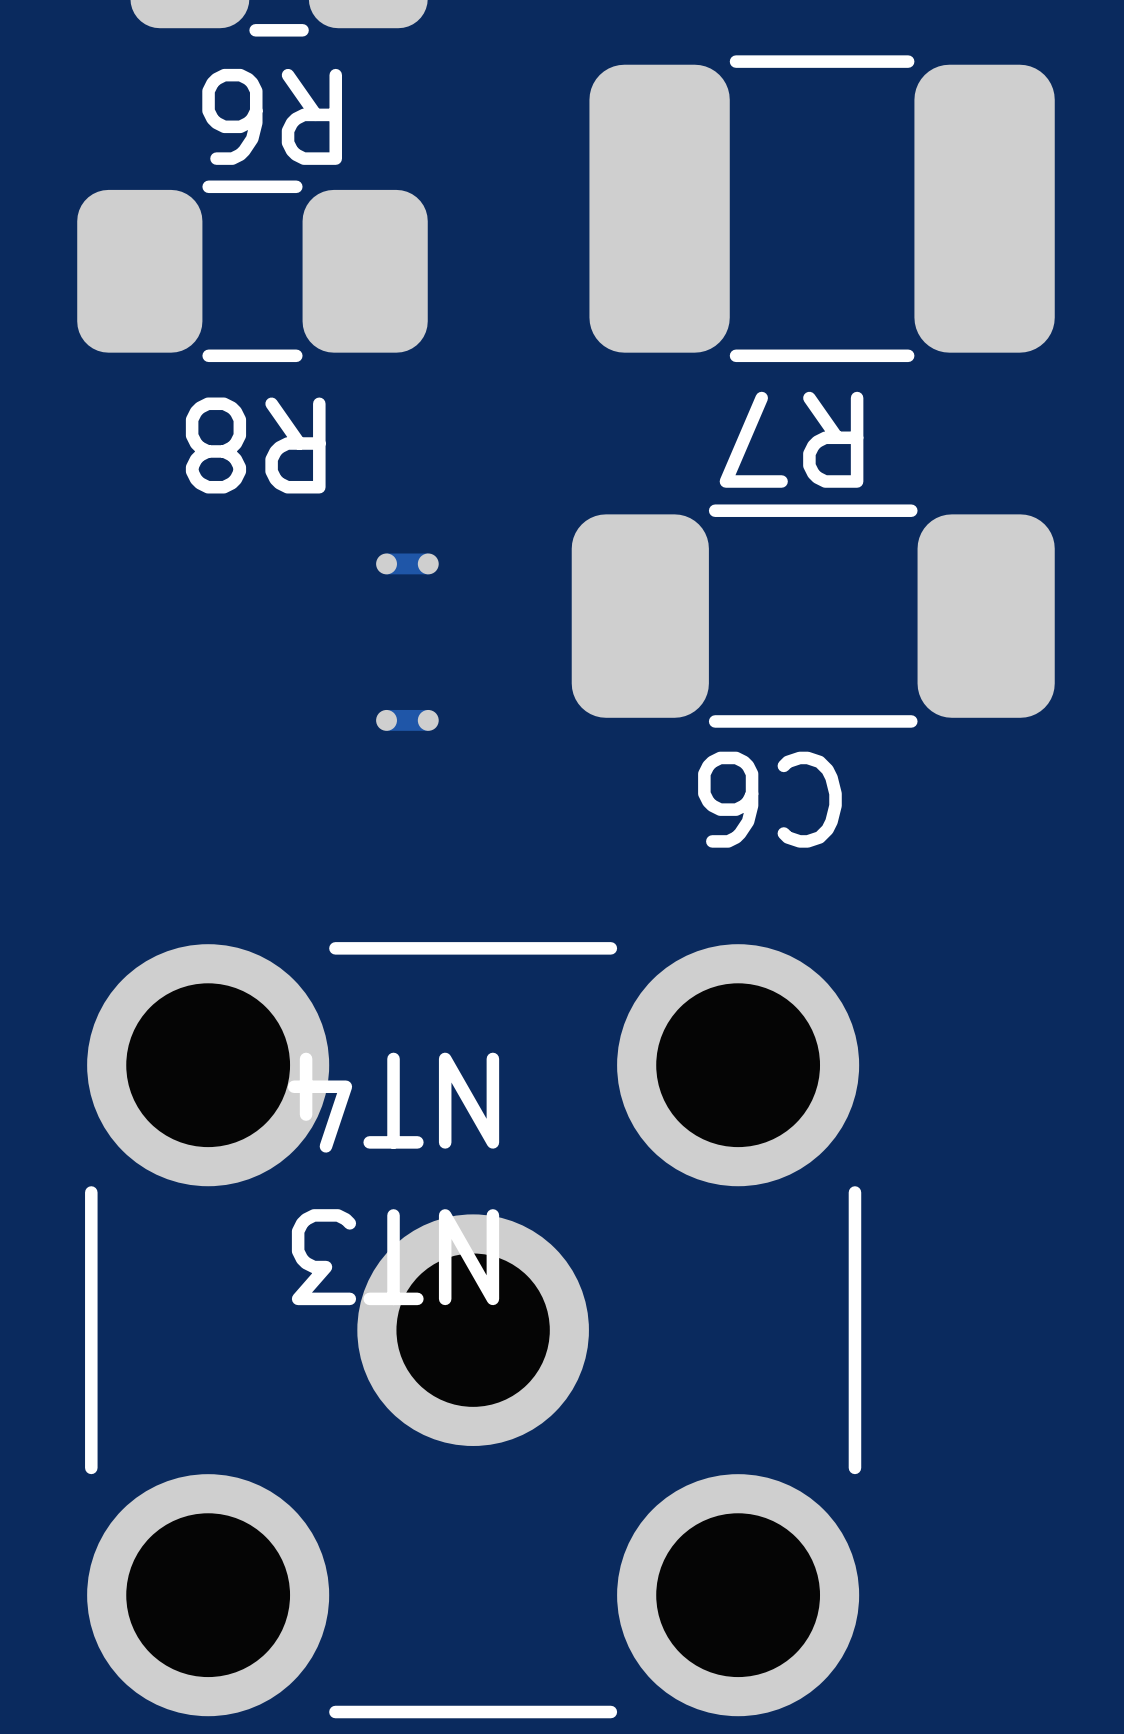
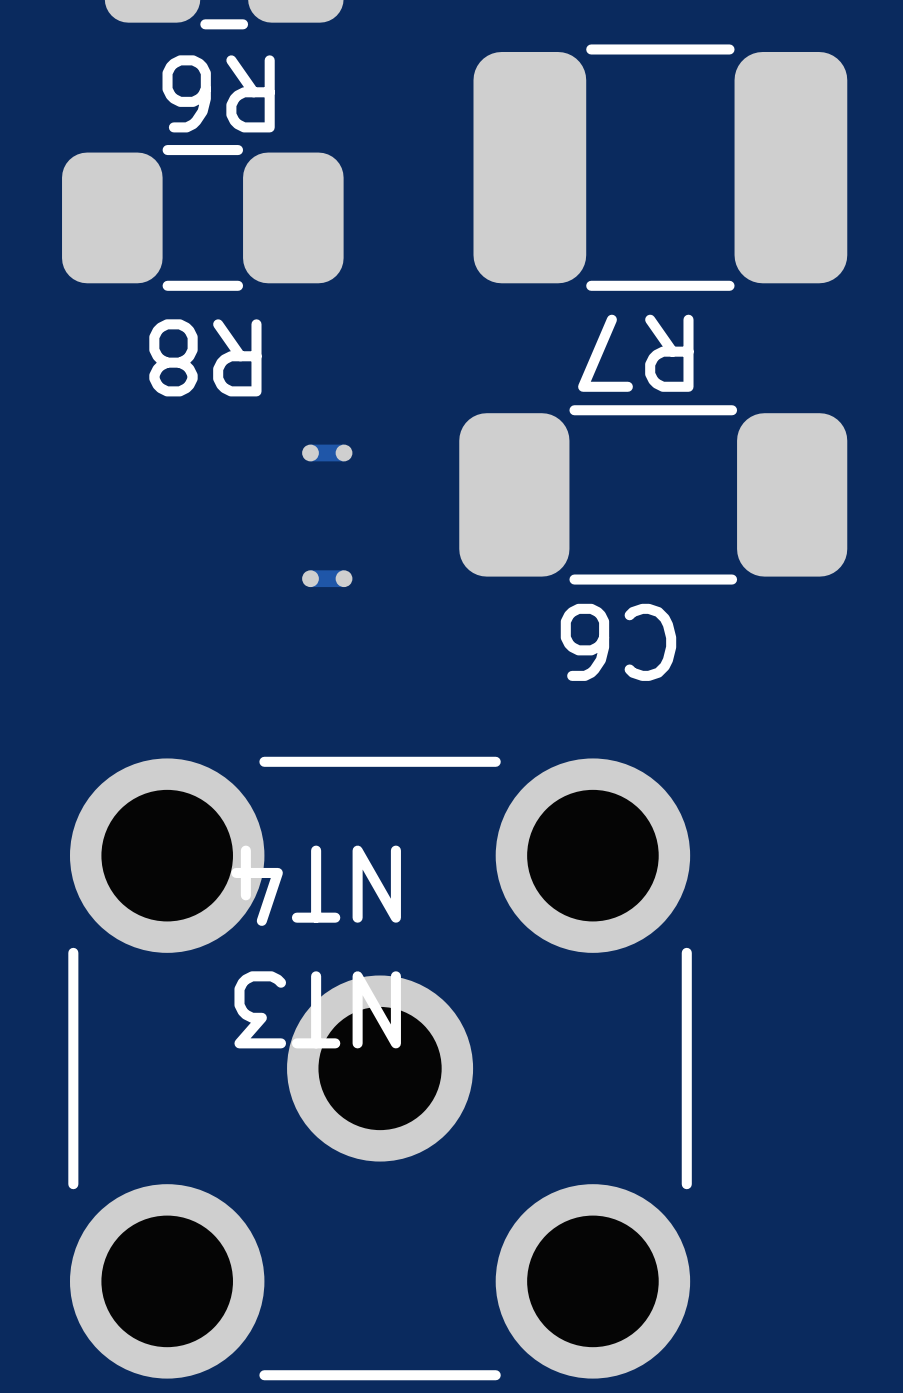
part footprint: [85, 942, 862, 1719] -> [68, 756, 692, 1381]

